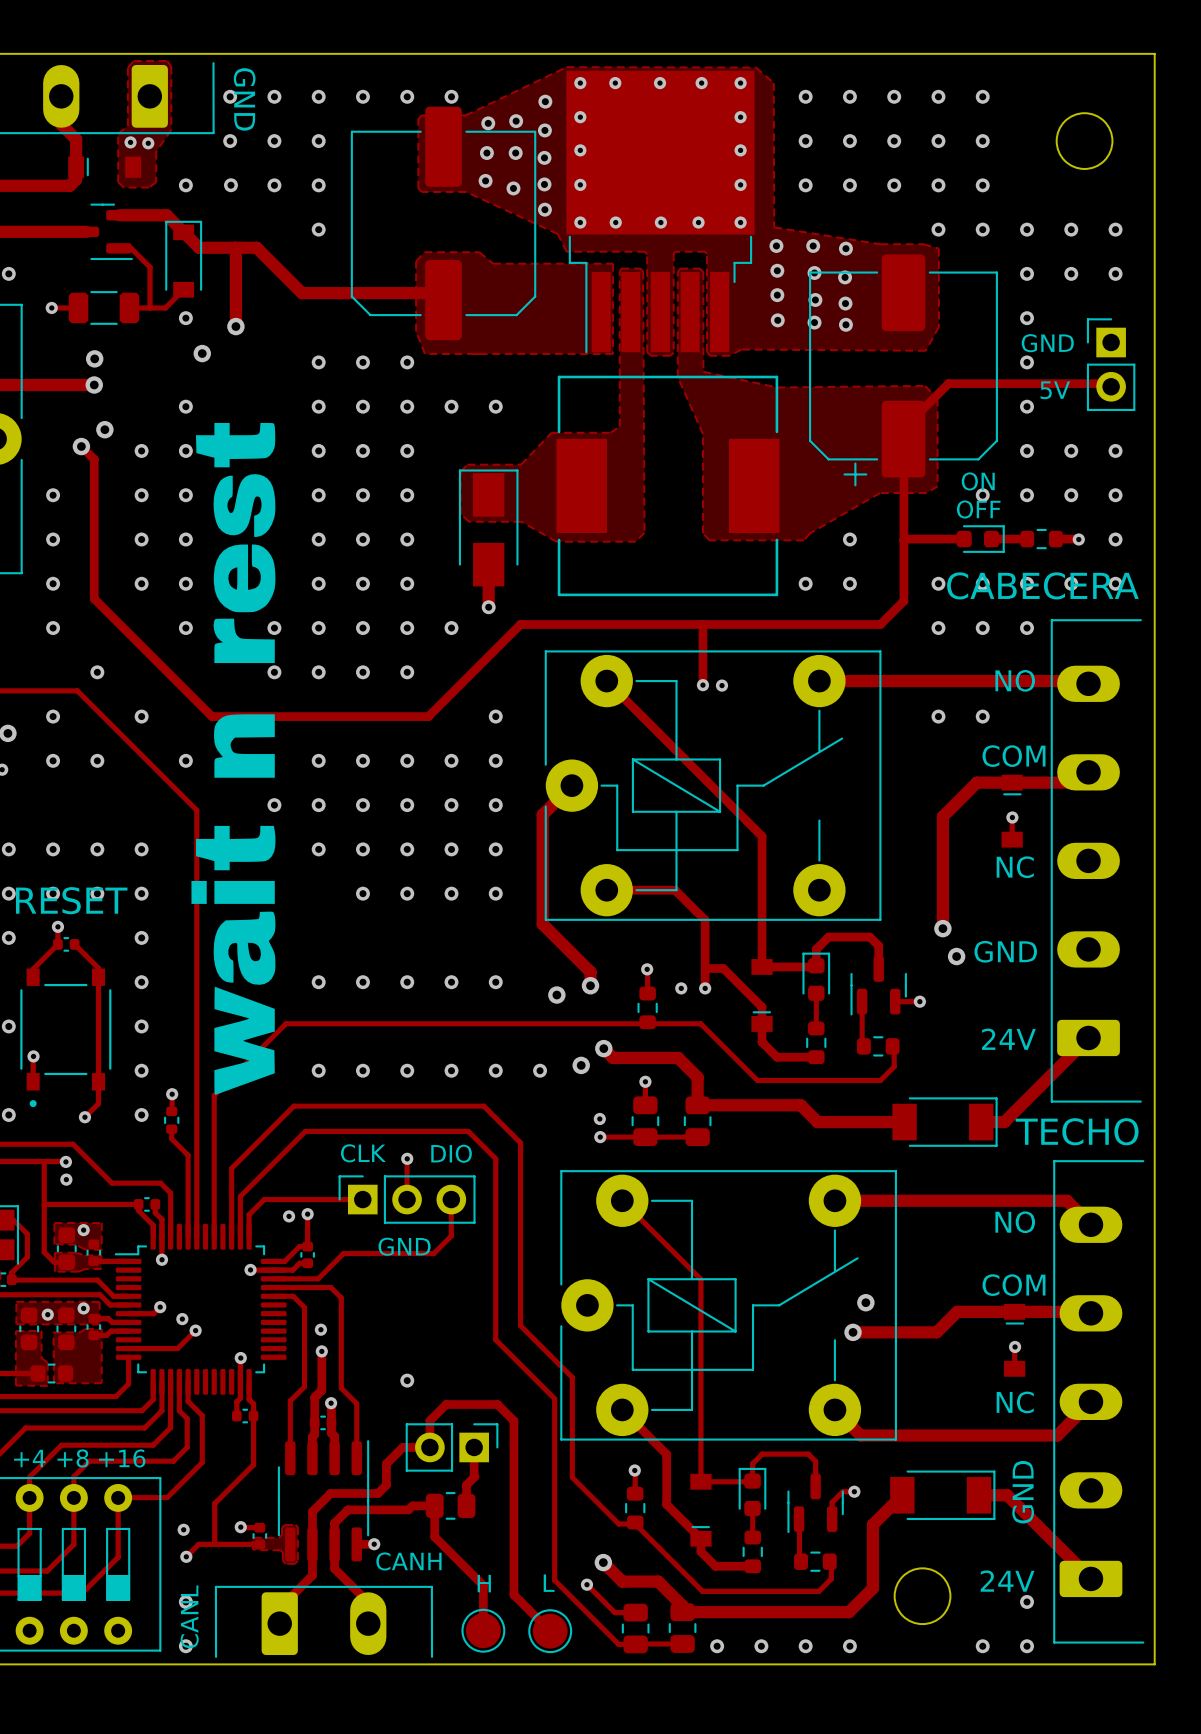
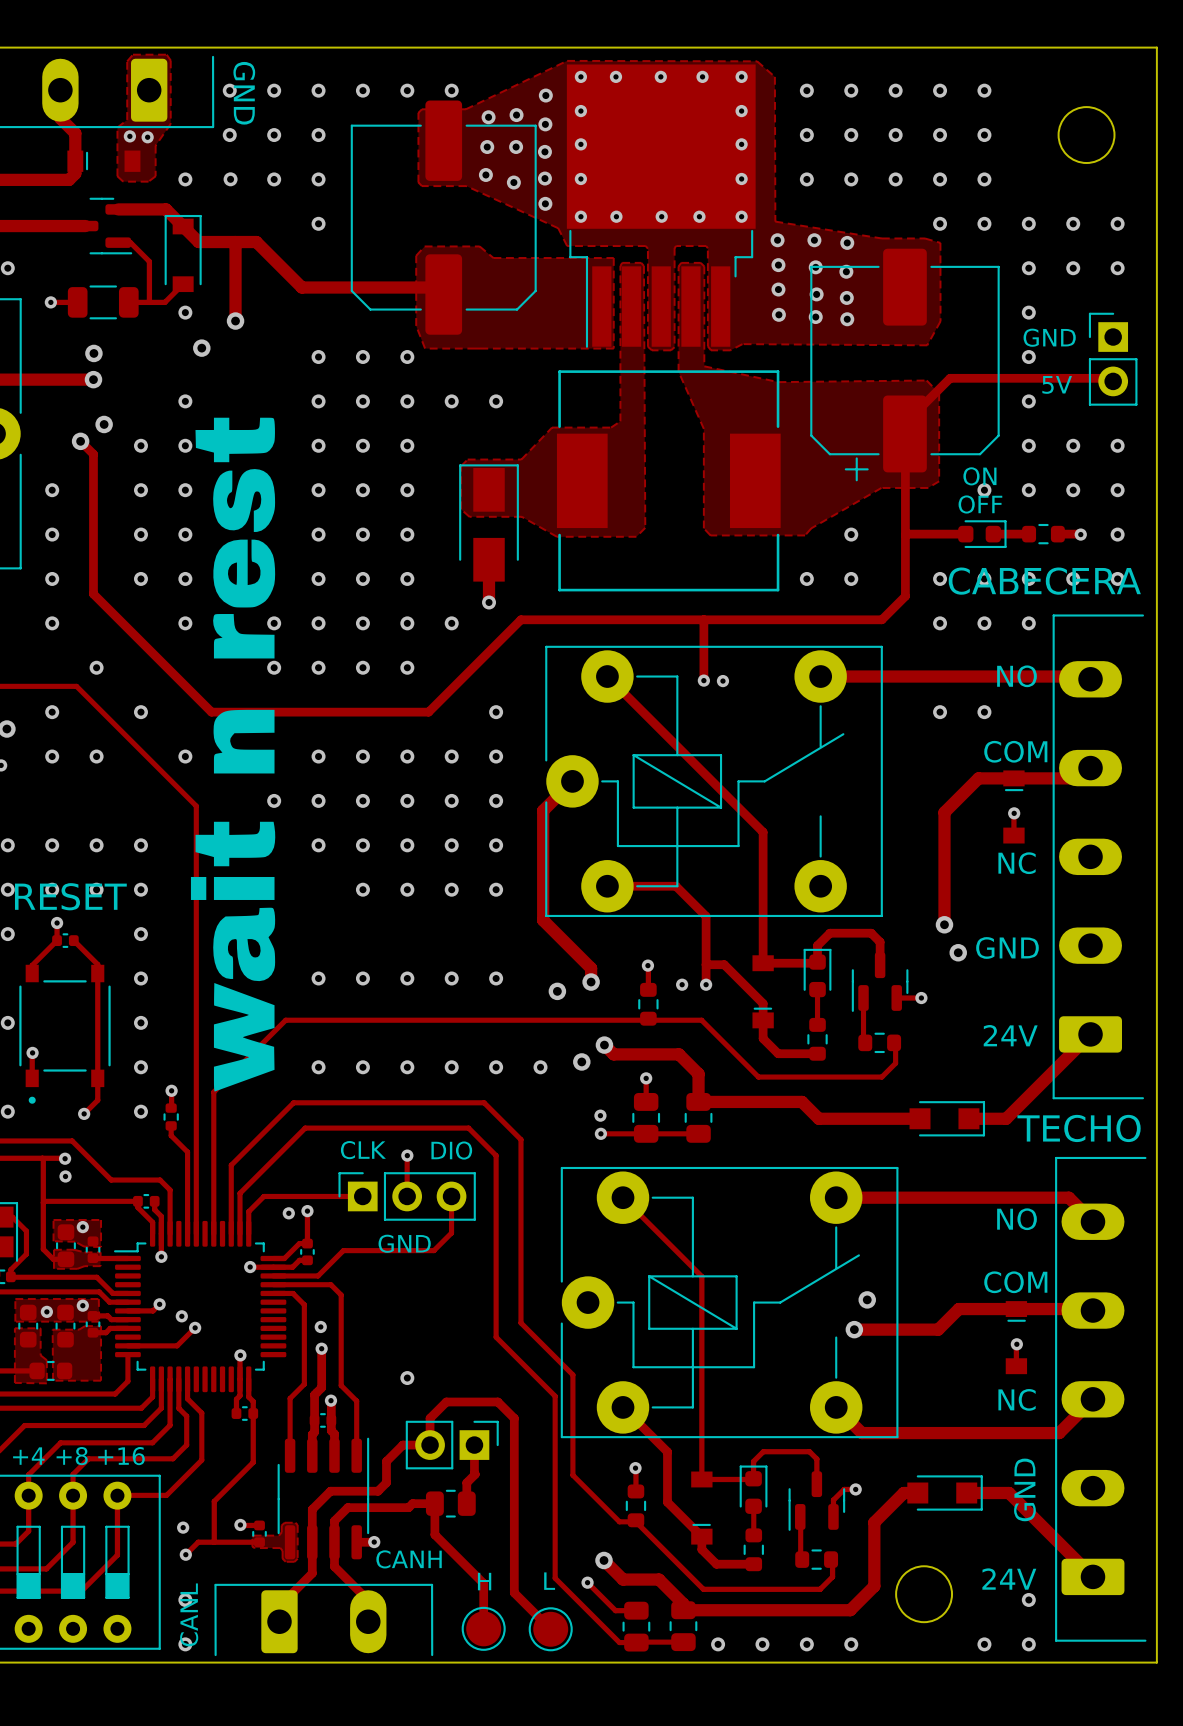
part footprint: [892, 1097, 998, 1147] -> [909, 1101, 986, 1137]
part footprint: [890, 1470, 996, 1521] -> [907, 1475, 983, 1511]

